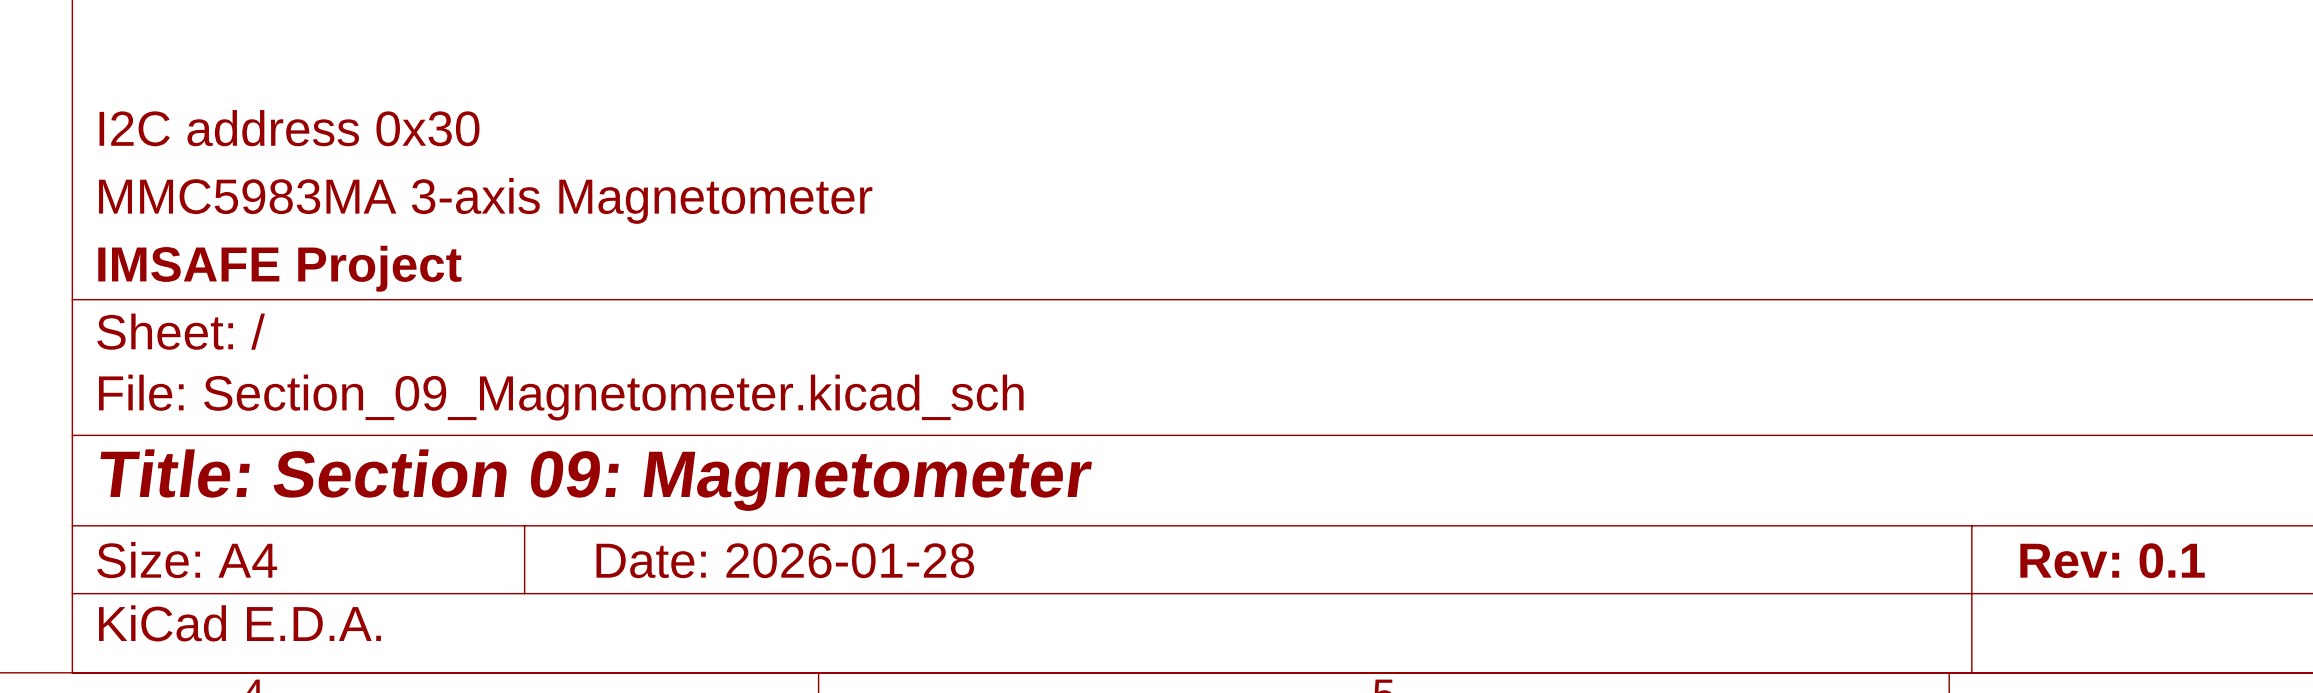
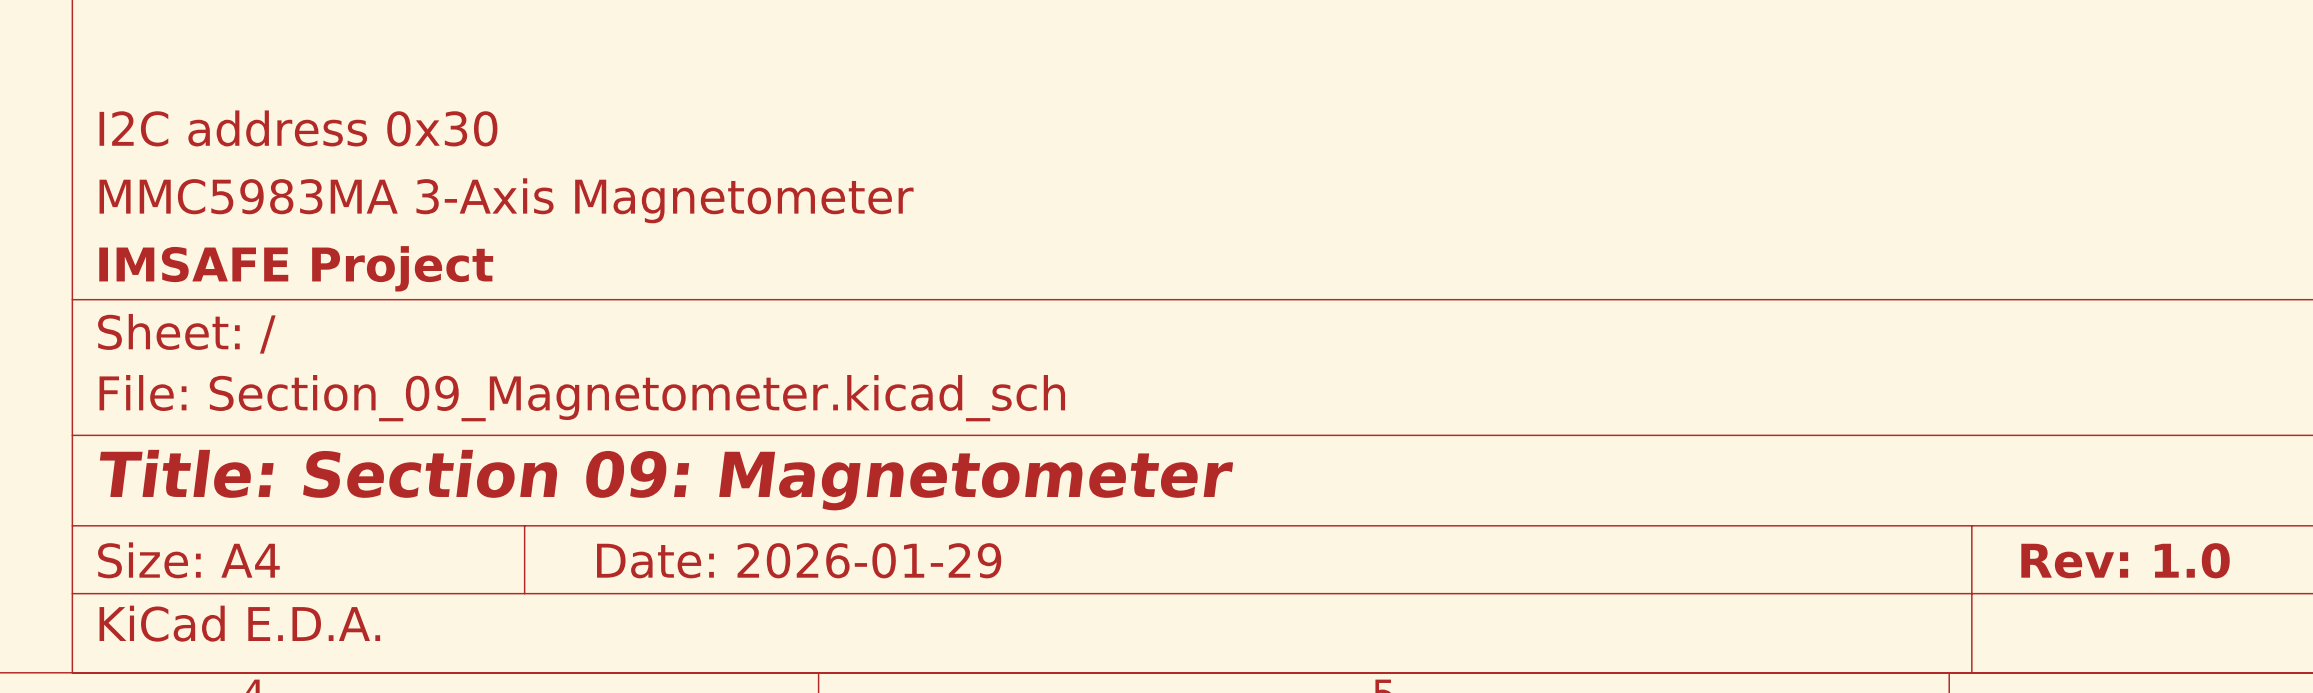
title block: MMC5983MA 3-axis Magnetometer (485, 200) -> MMC5983MA 3-Axis Magnetometer (506, 200)
title block: Date: 2026-01-28 (785, 560) -> Date: 2026-01-29 (799, 560)
title block: Rev: 0.1 (2112, 560) -> Rev: 1.0 (2125, 560)

